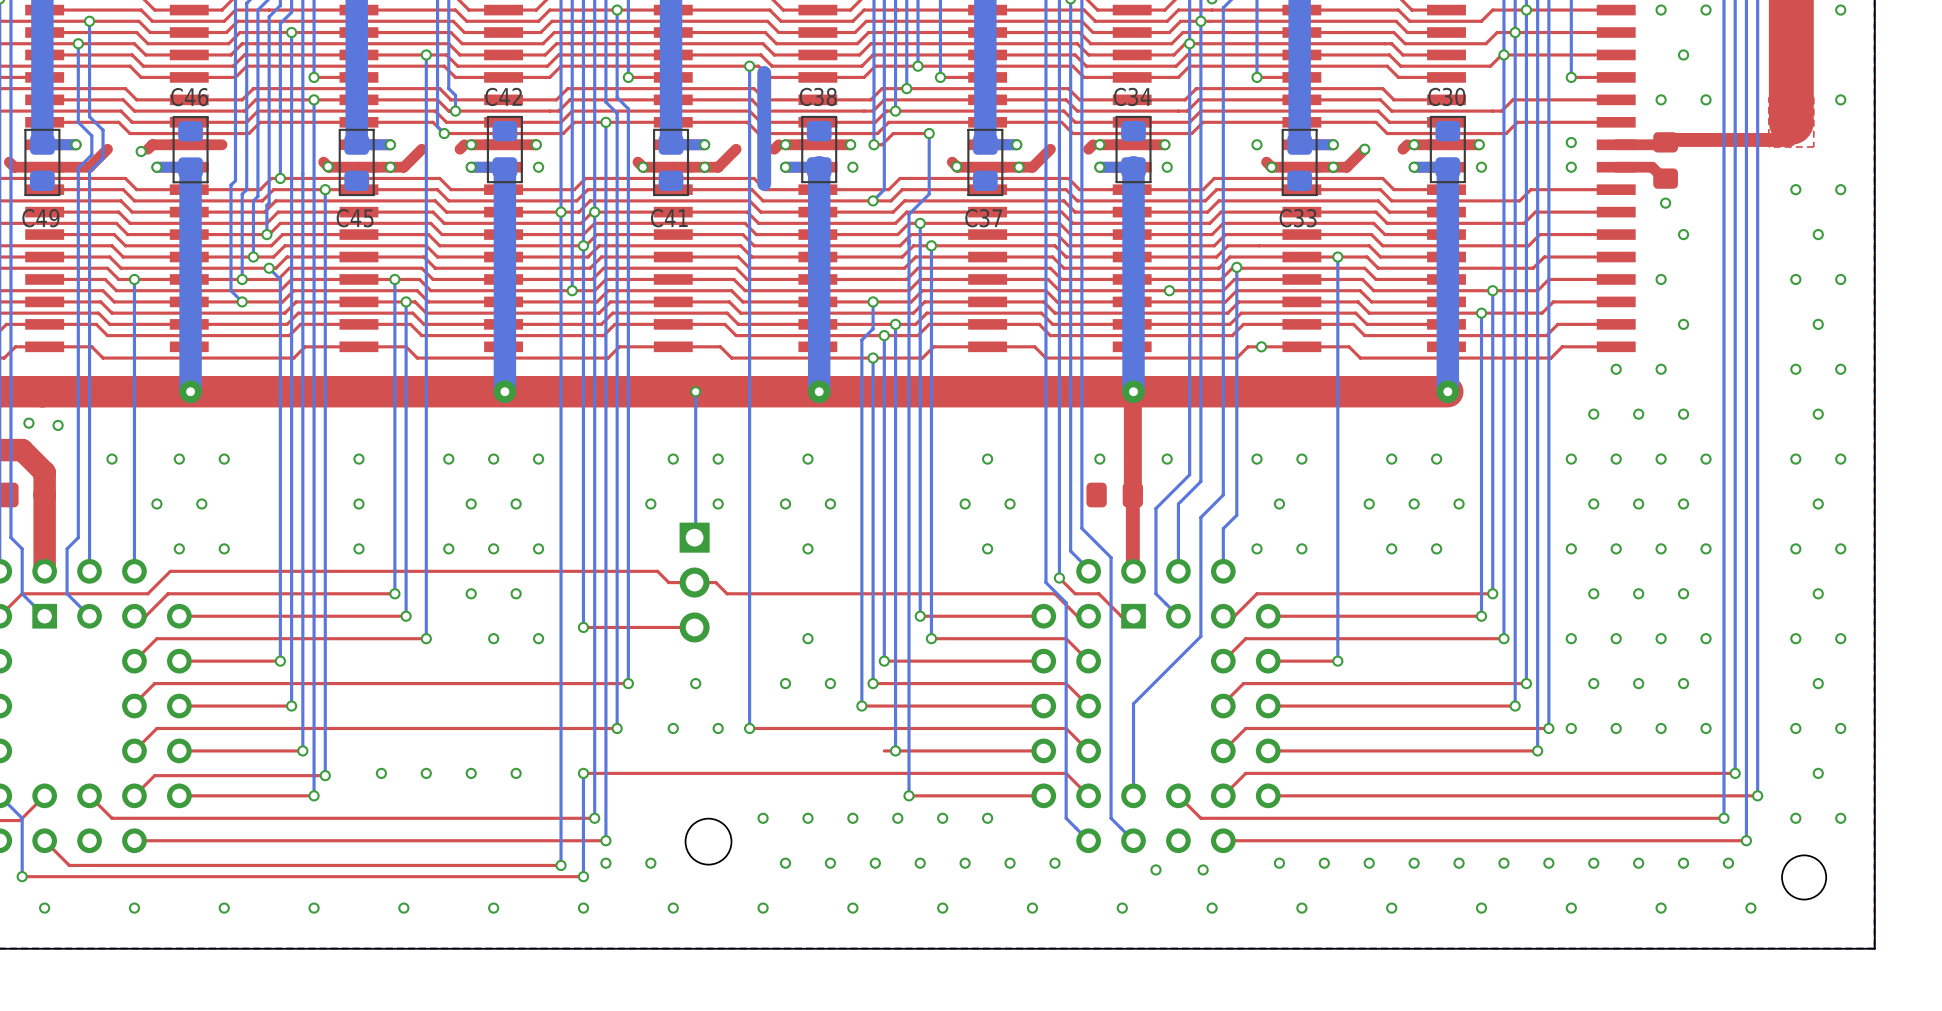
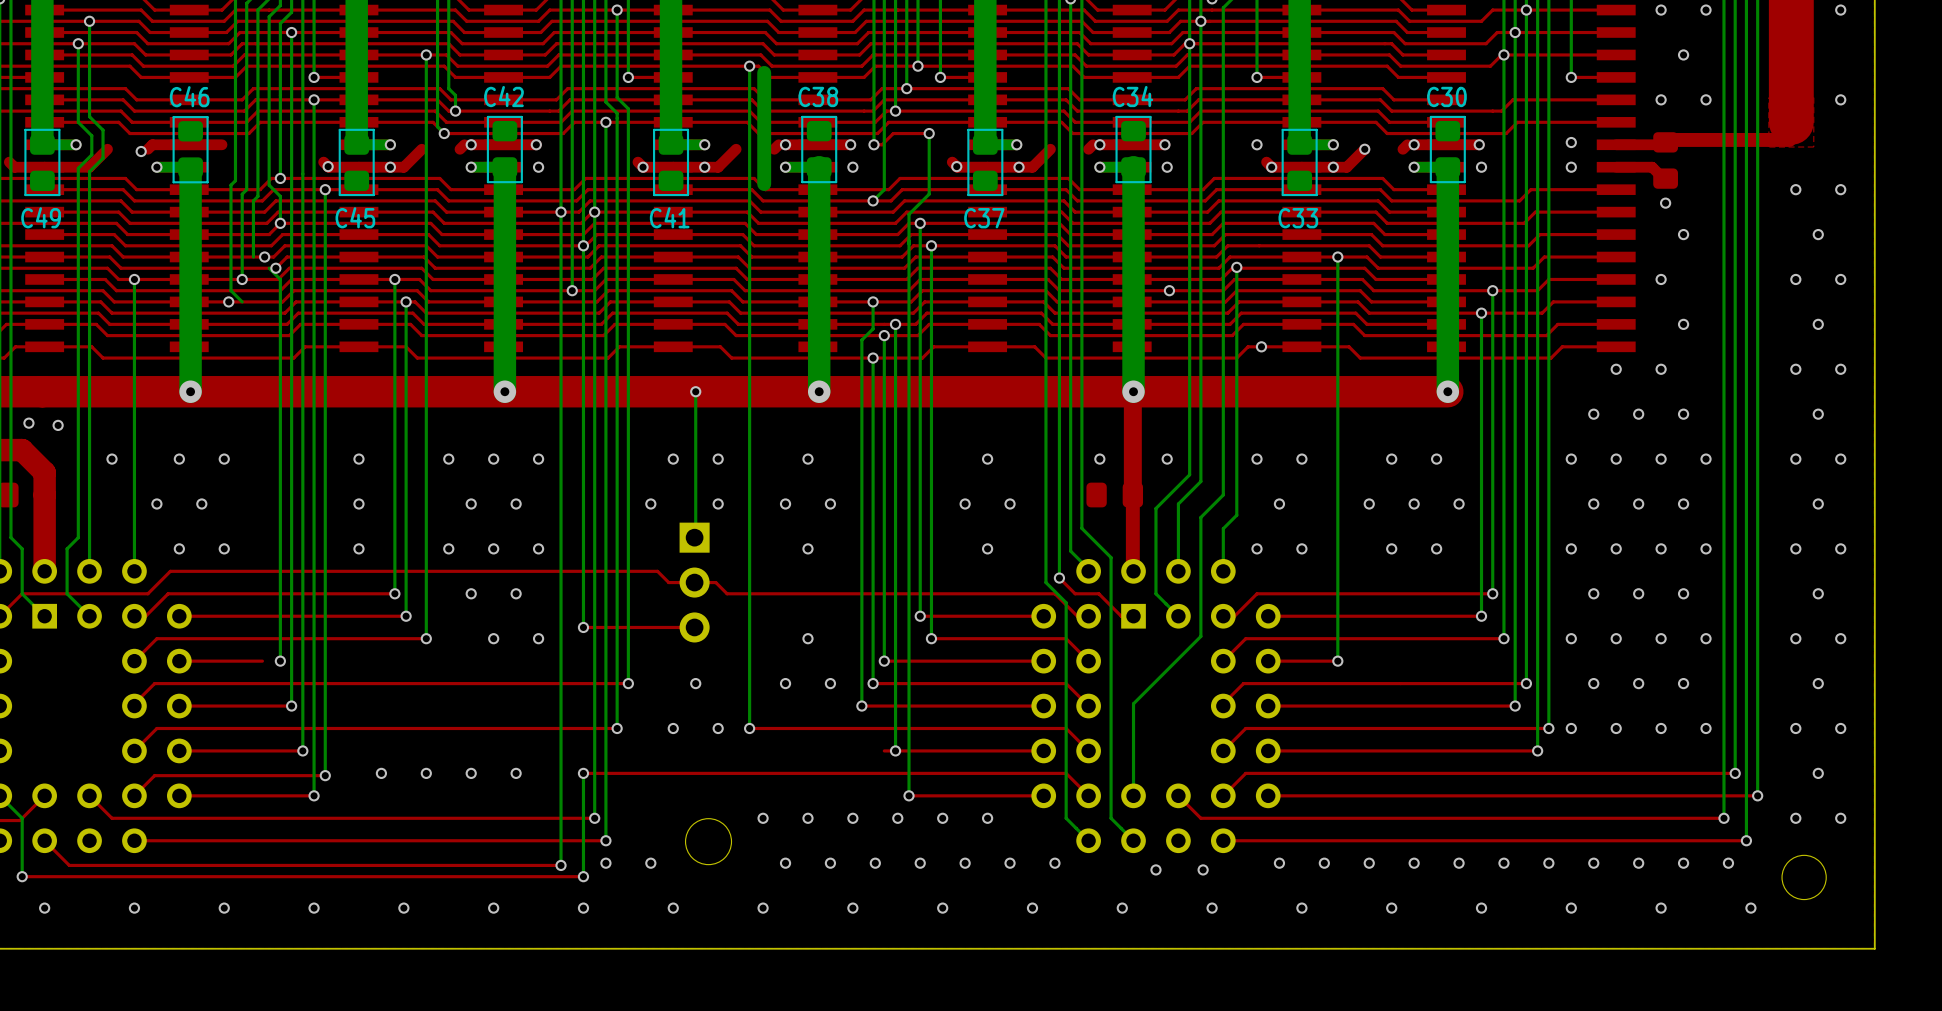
bottom track: (269, 185) (266, 234) -> (269, 185) (280, 196) (280, 223)
via: none -> (280, 223)
via: (266, 234) -> none
via: (253, 257) -> none
via: none -> (264, 257)
via: (269, 268) -> none
via: none -> (275, 268)
via position: (242, 301) -> (228, 301)
top track: (280, 661) (262, 661) -> none

